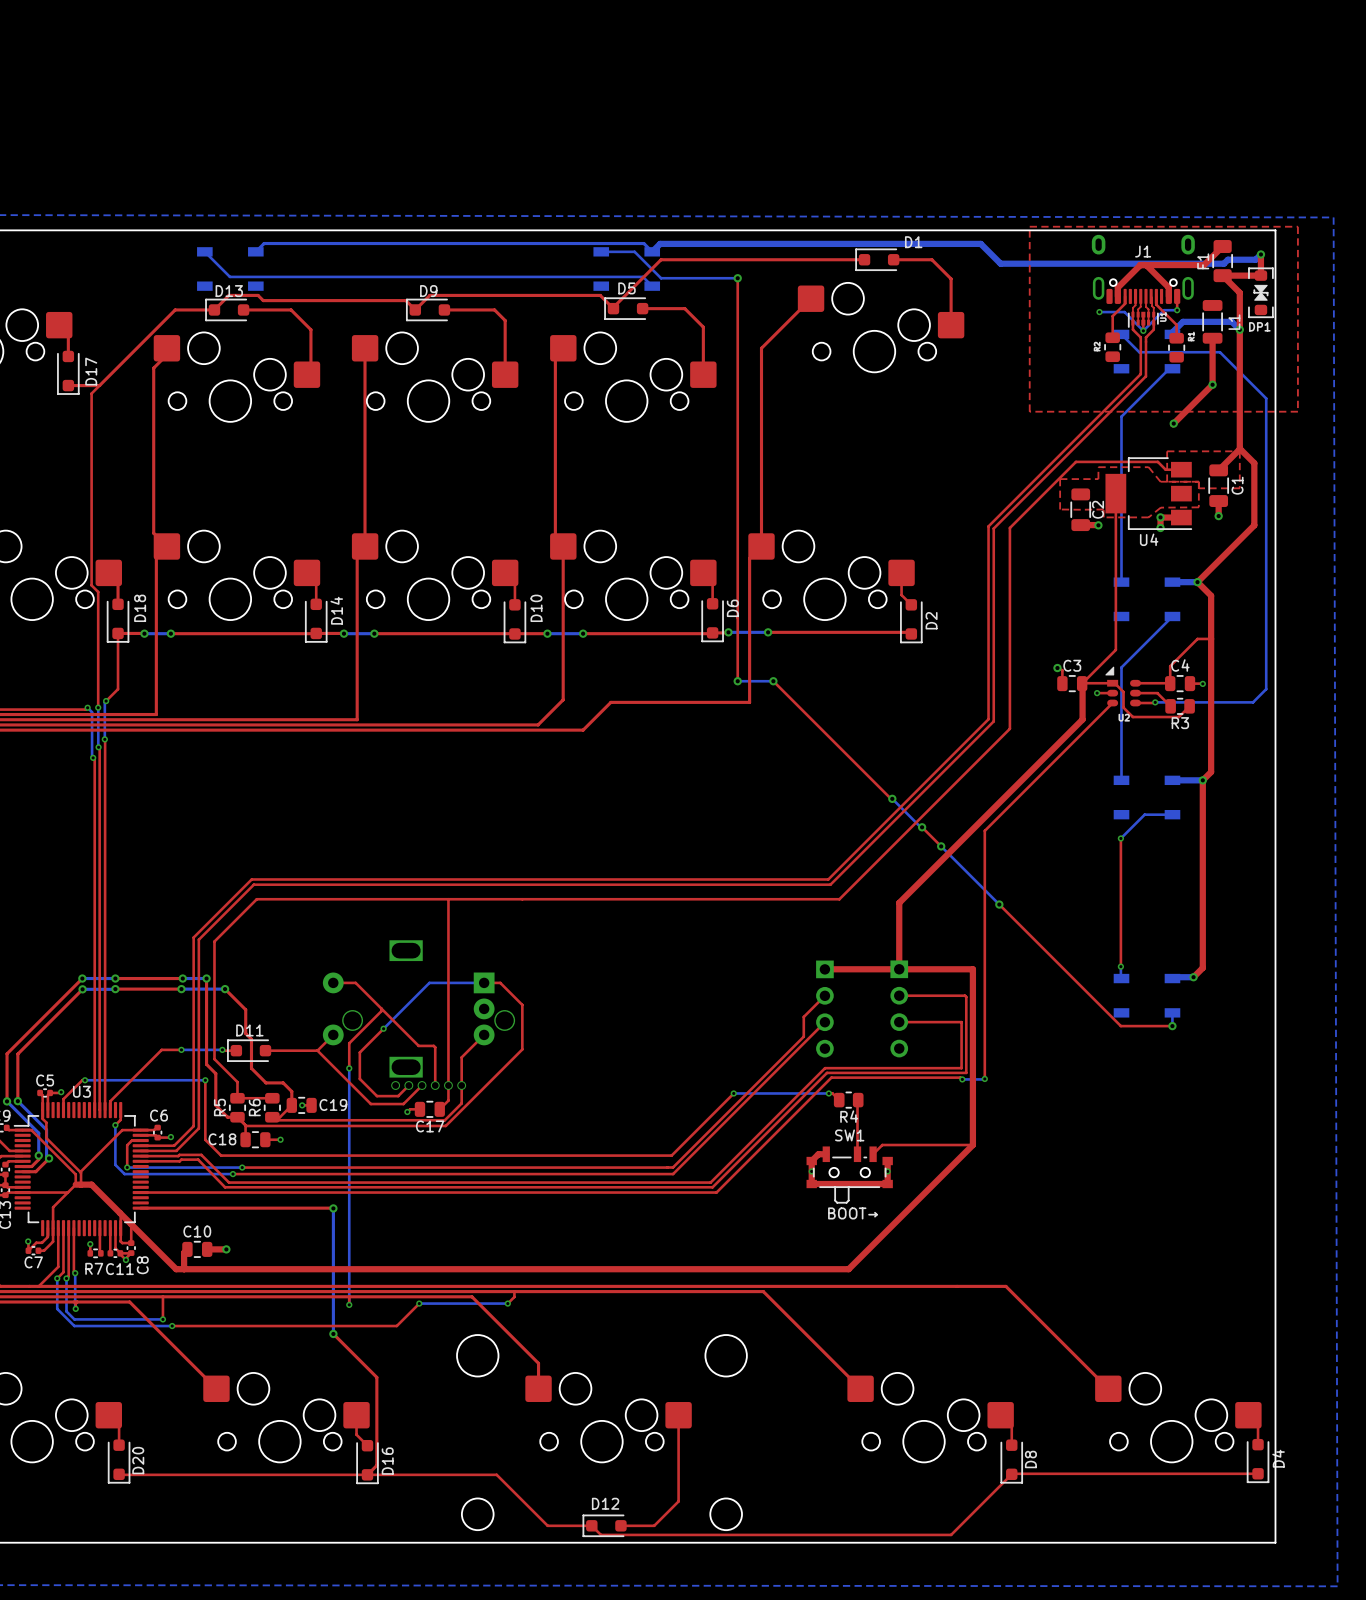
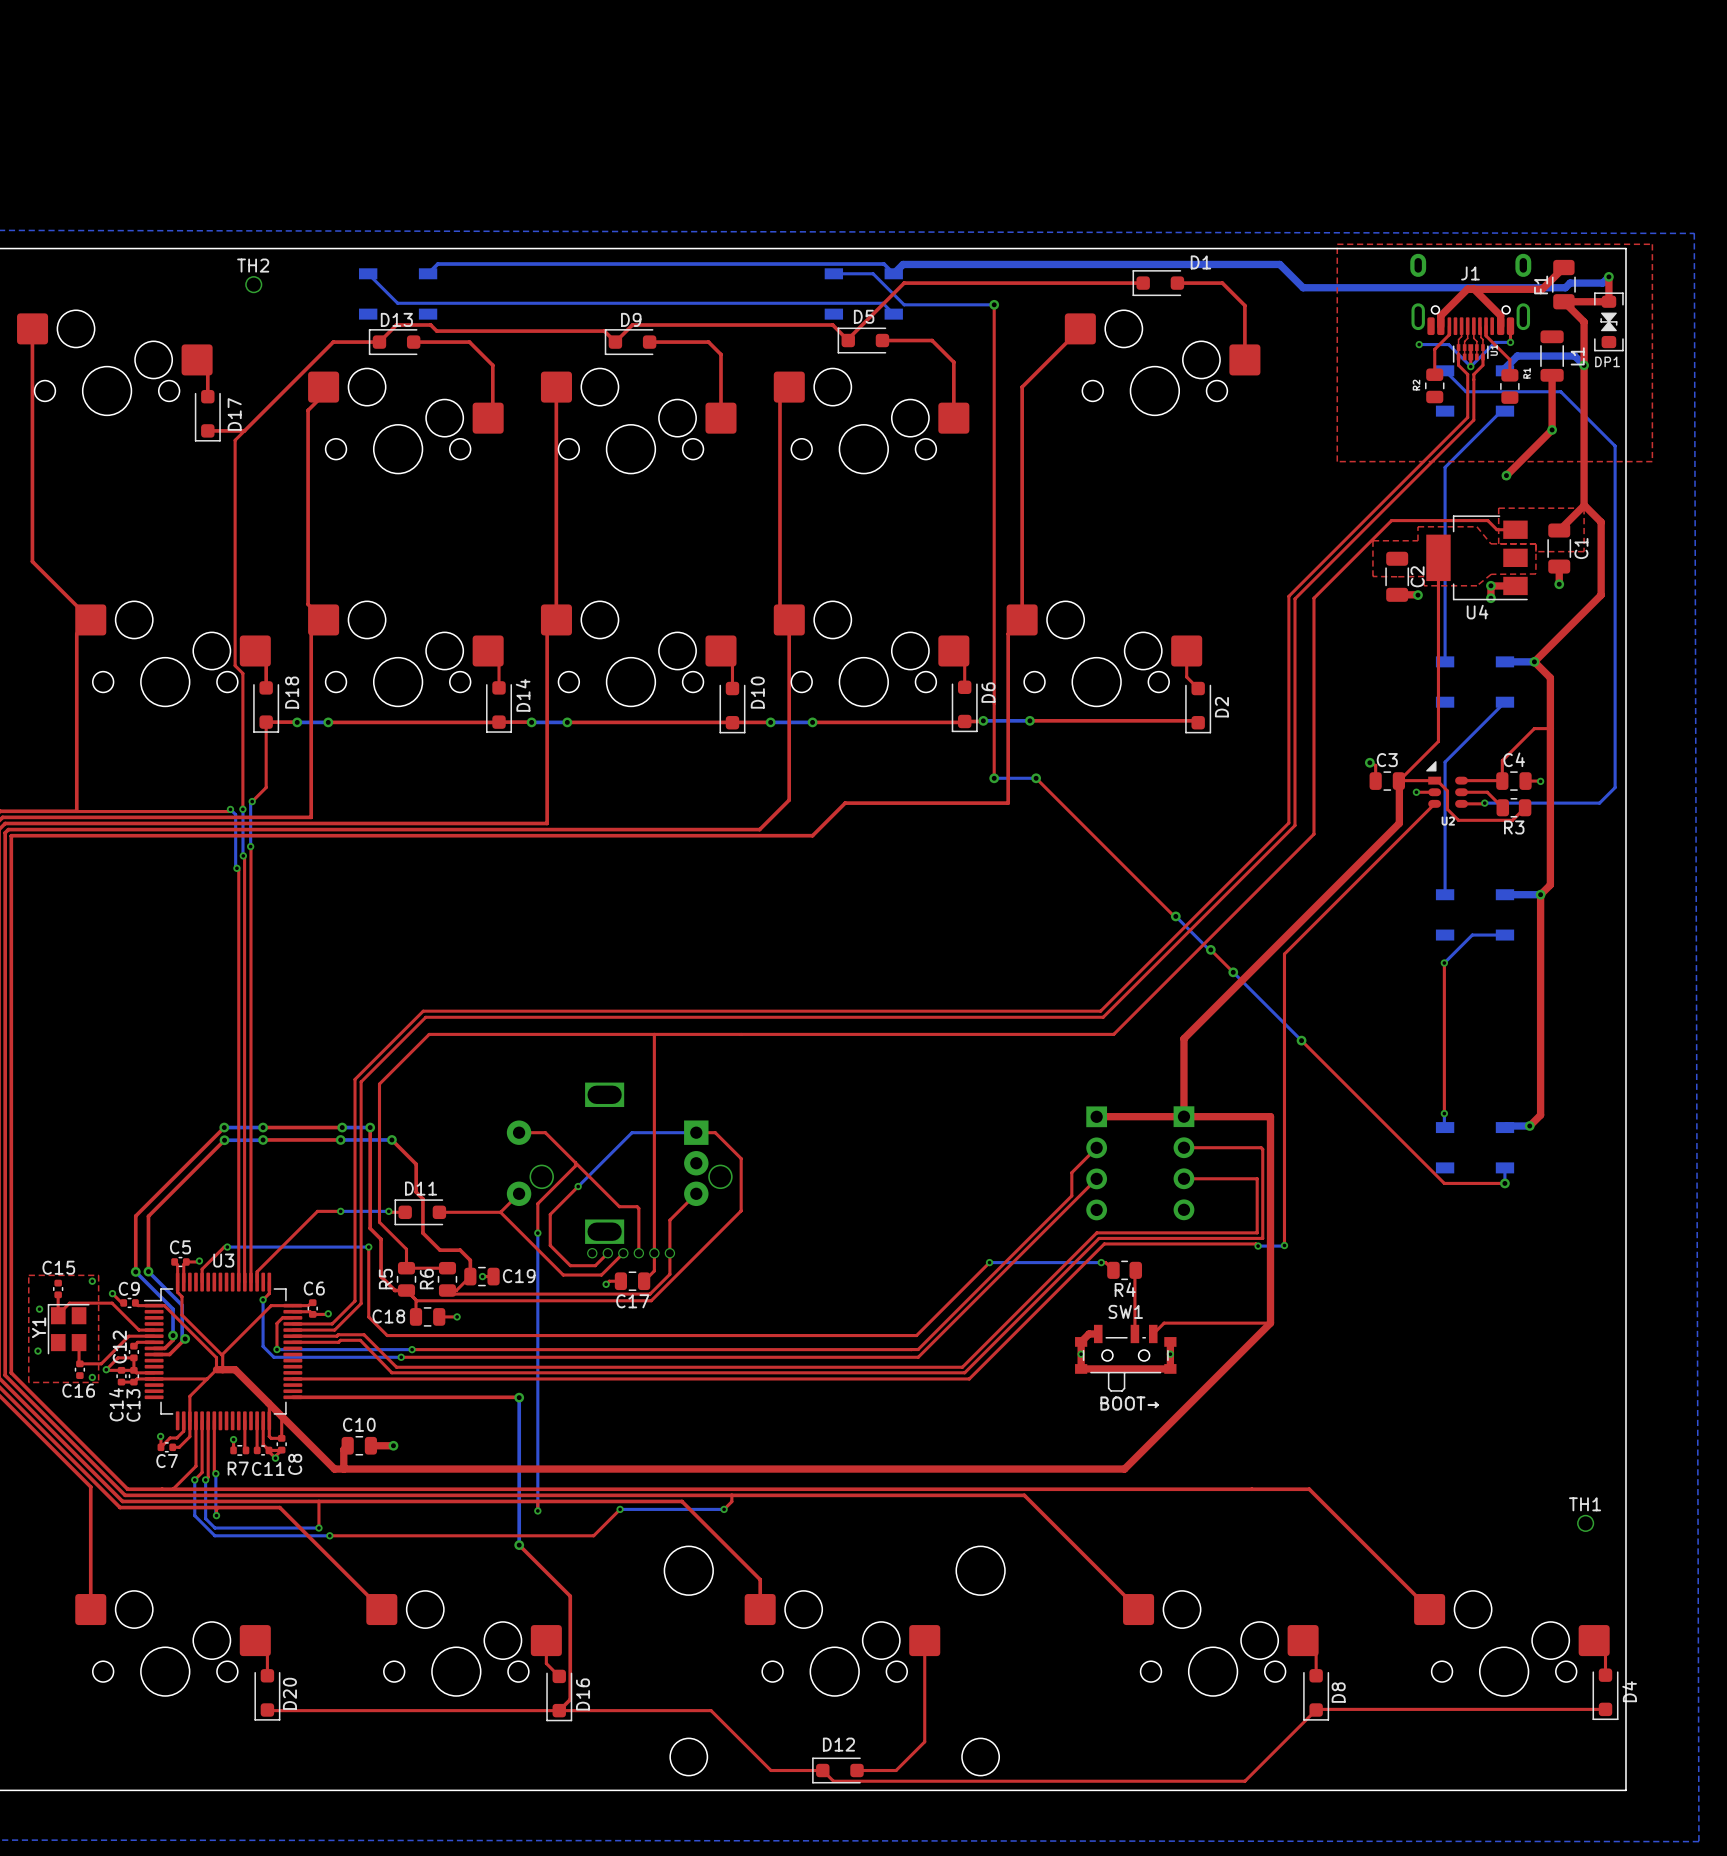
TH2: none -> (253, 284)
TH1: none -> (1585, 1523)

